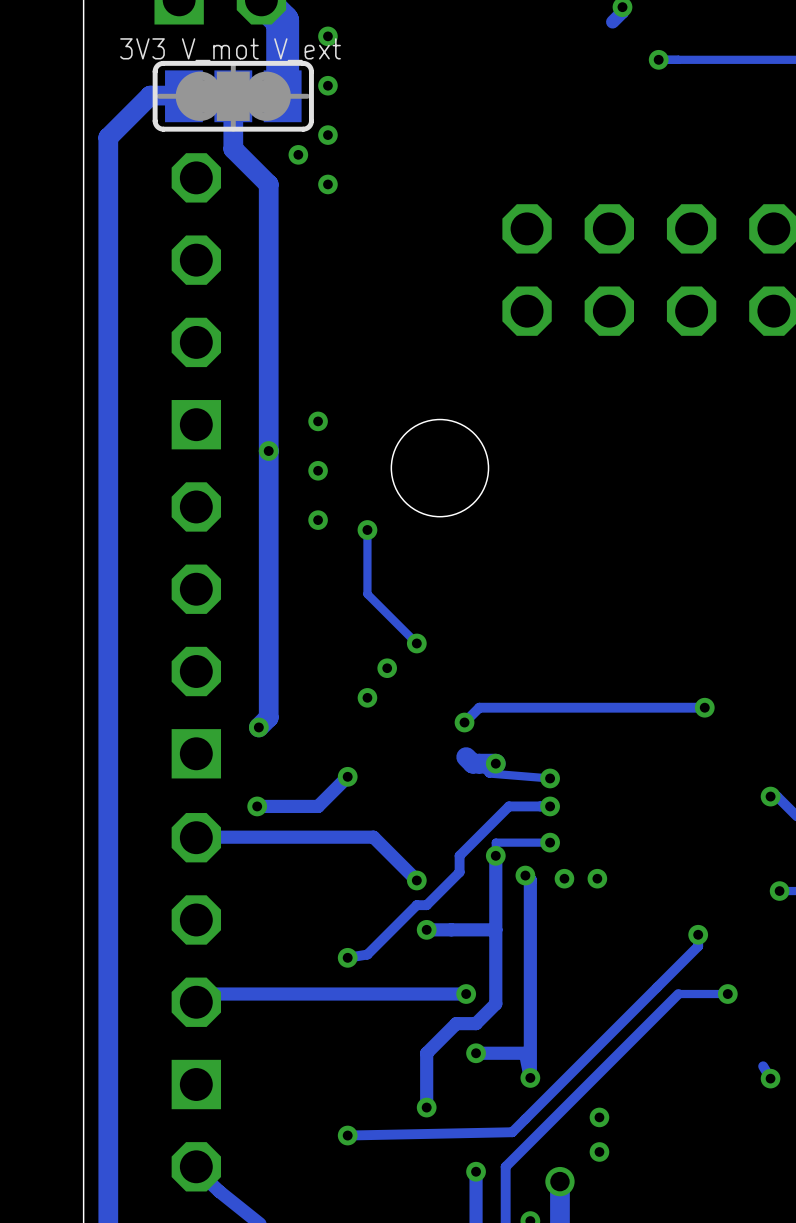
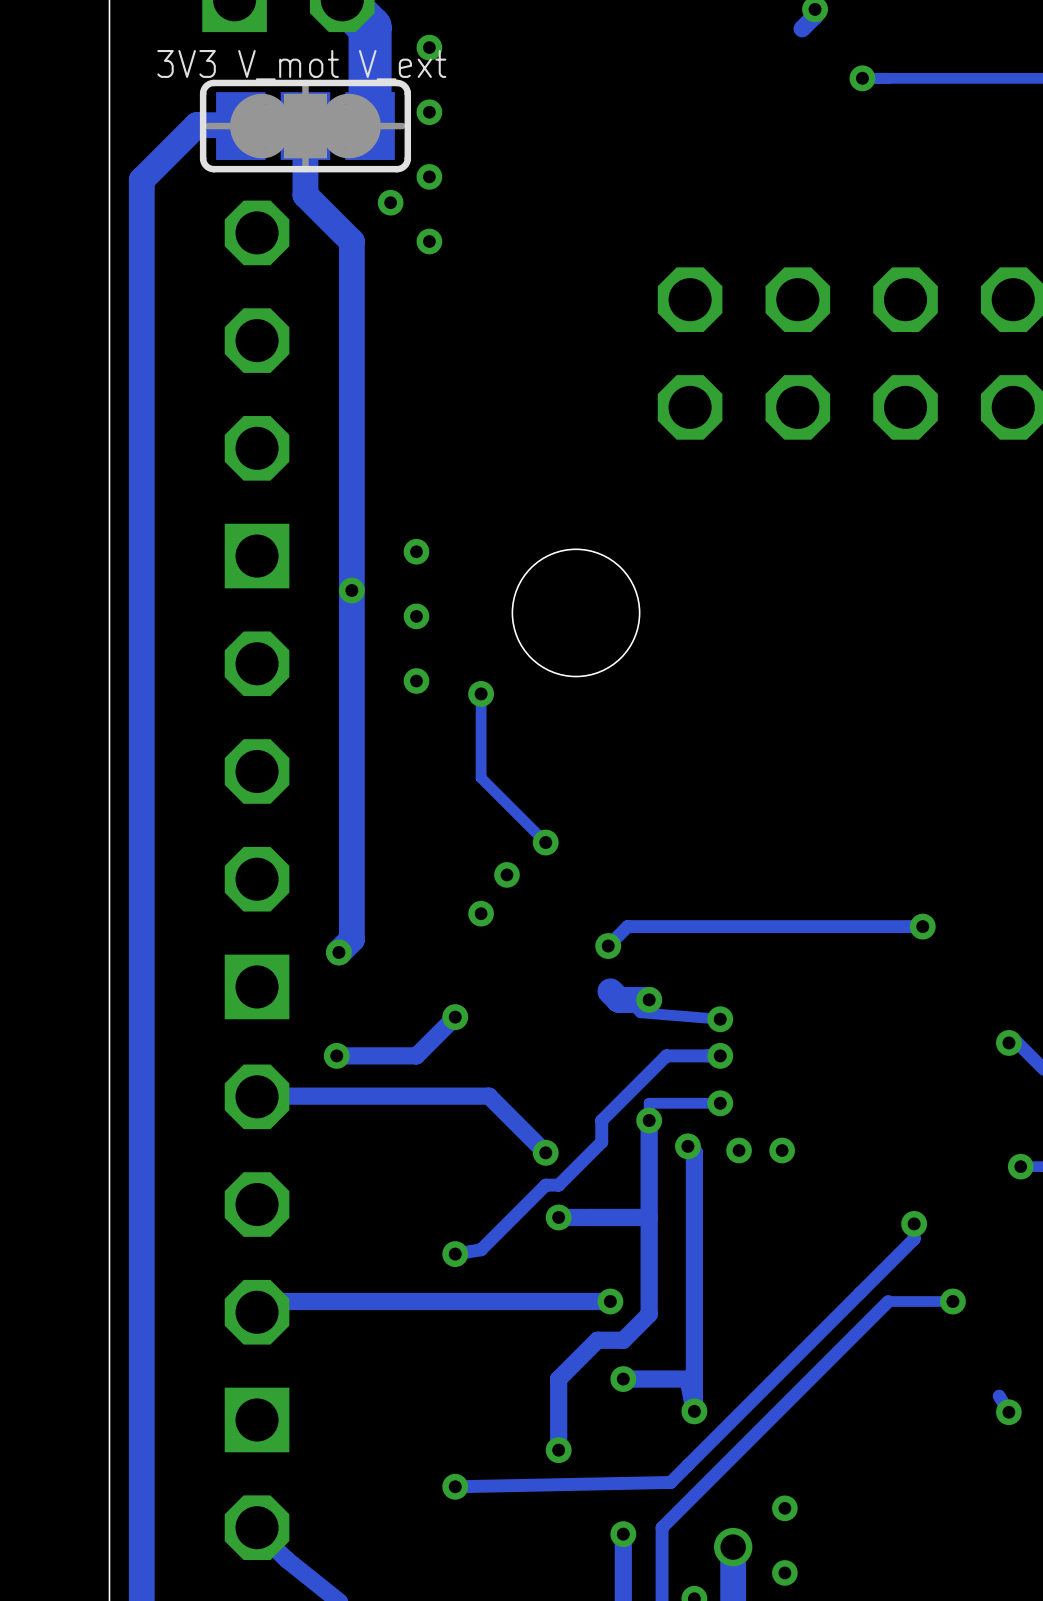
via: (599, 1117) -> none
via: none -> (784, 1572)

